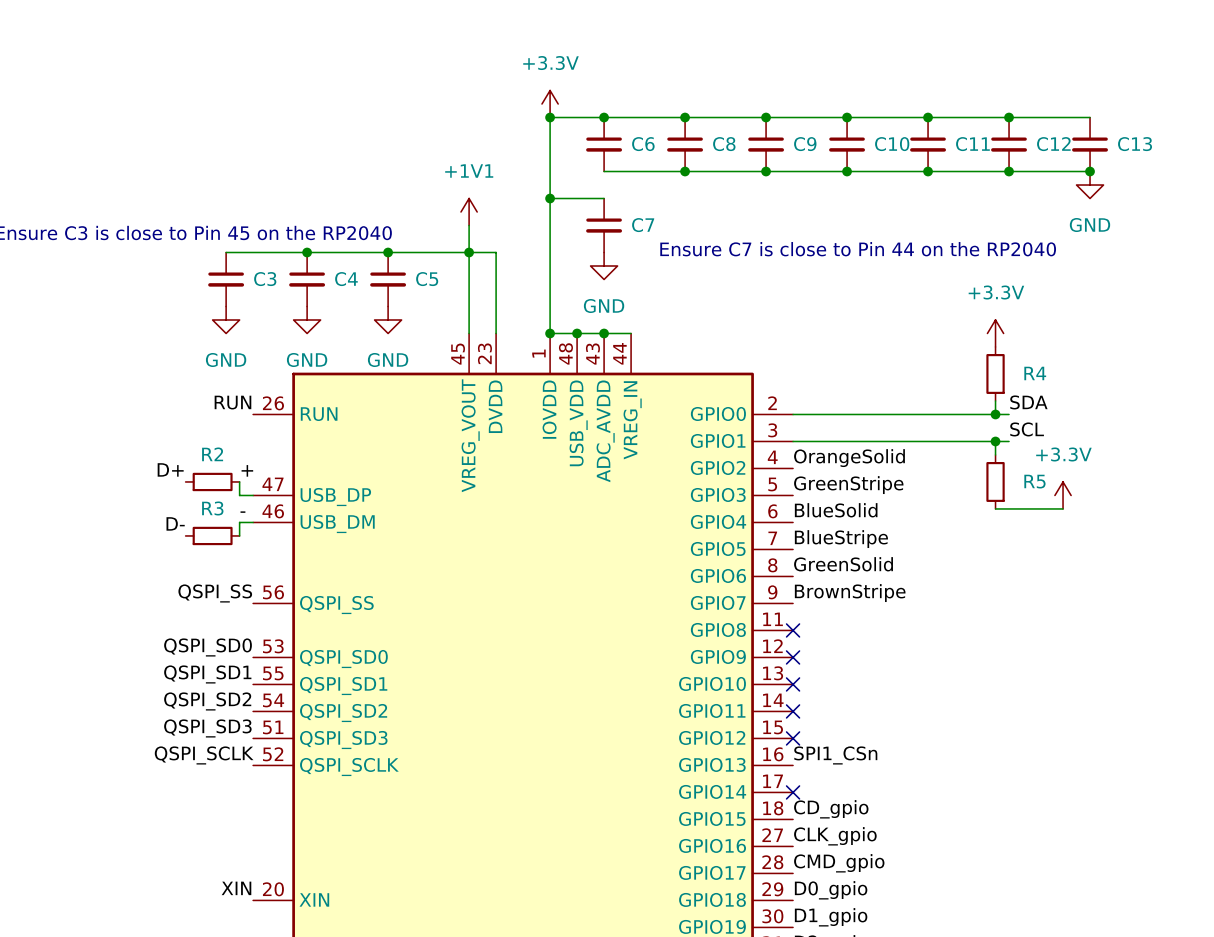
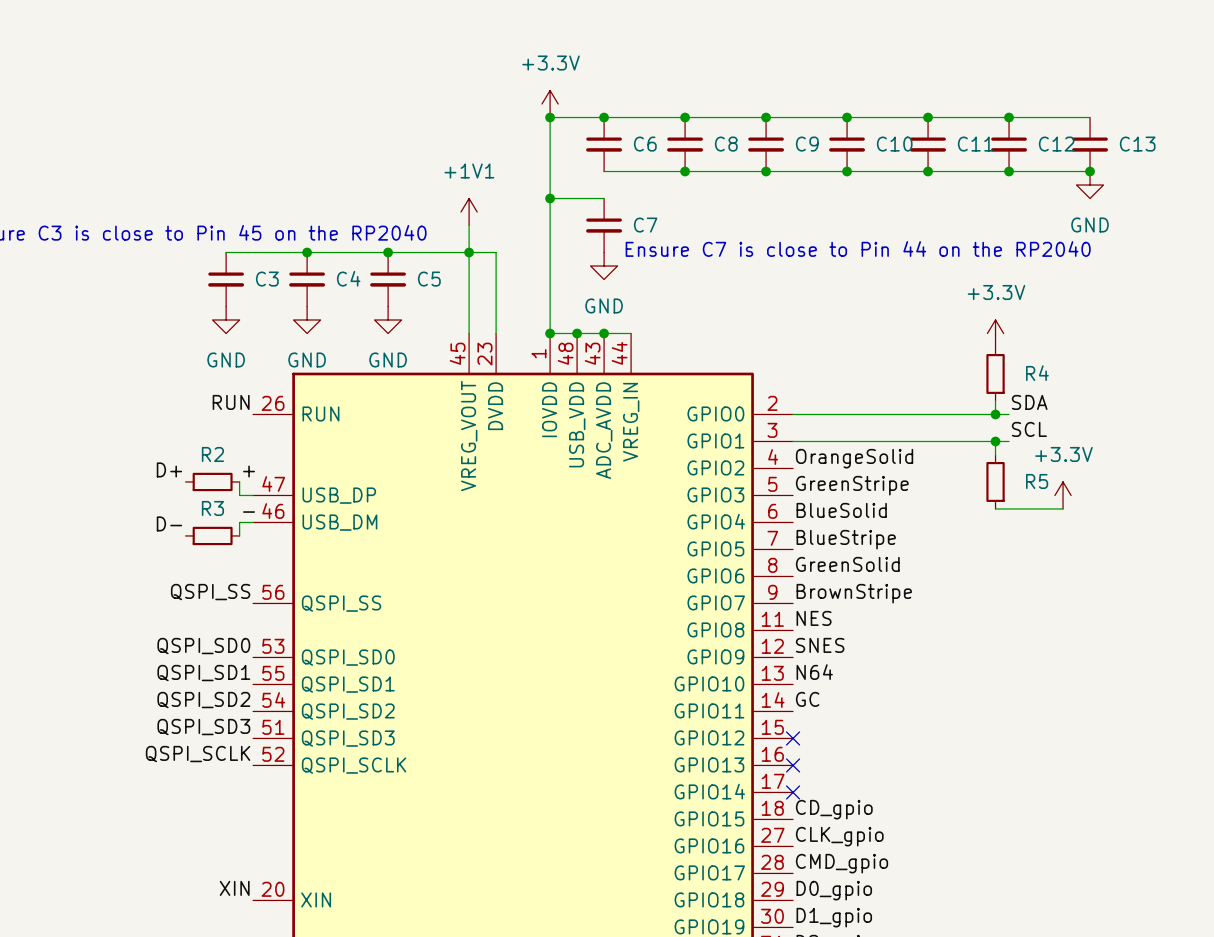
label: none -> NES (814, 618)
no-connect mark: (793, 630) -> none
label: none -> SNES (820, 645)
no-connect mark: (793, 657) -> none
label: none -> N64 (814, 672)
no-connect mark: (793, 684) -> none
label: none -> GC (807, 699)
no-connect mark: (793, 711) -> none
label: SPI1_CSn (835, 755) -> none
no-connect mark: none -> (793, 765)

